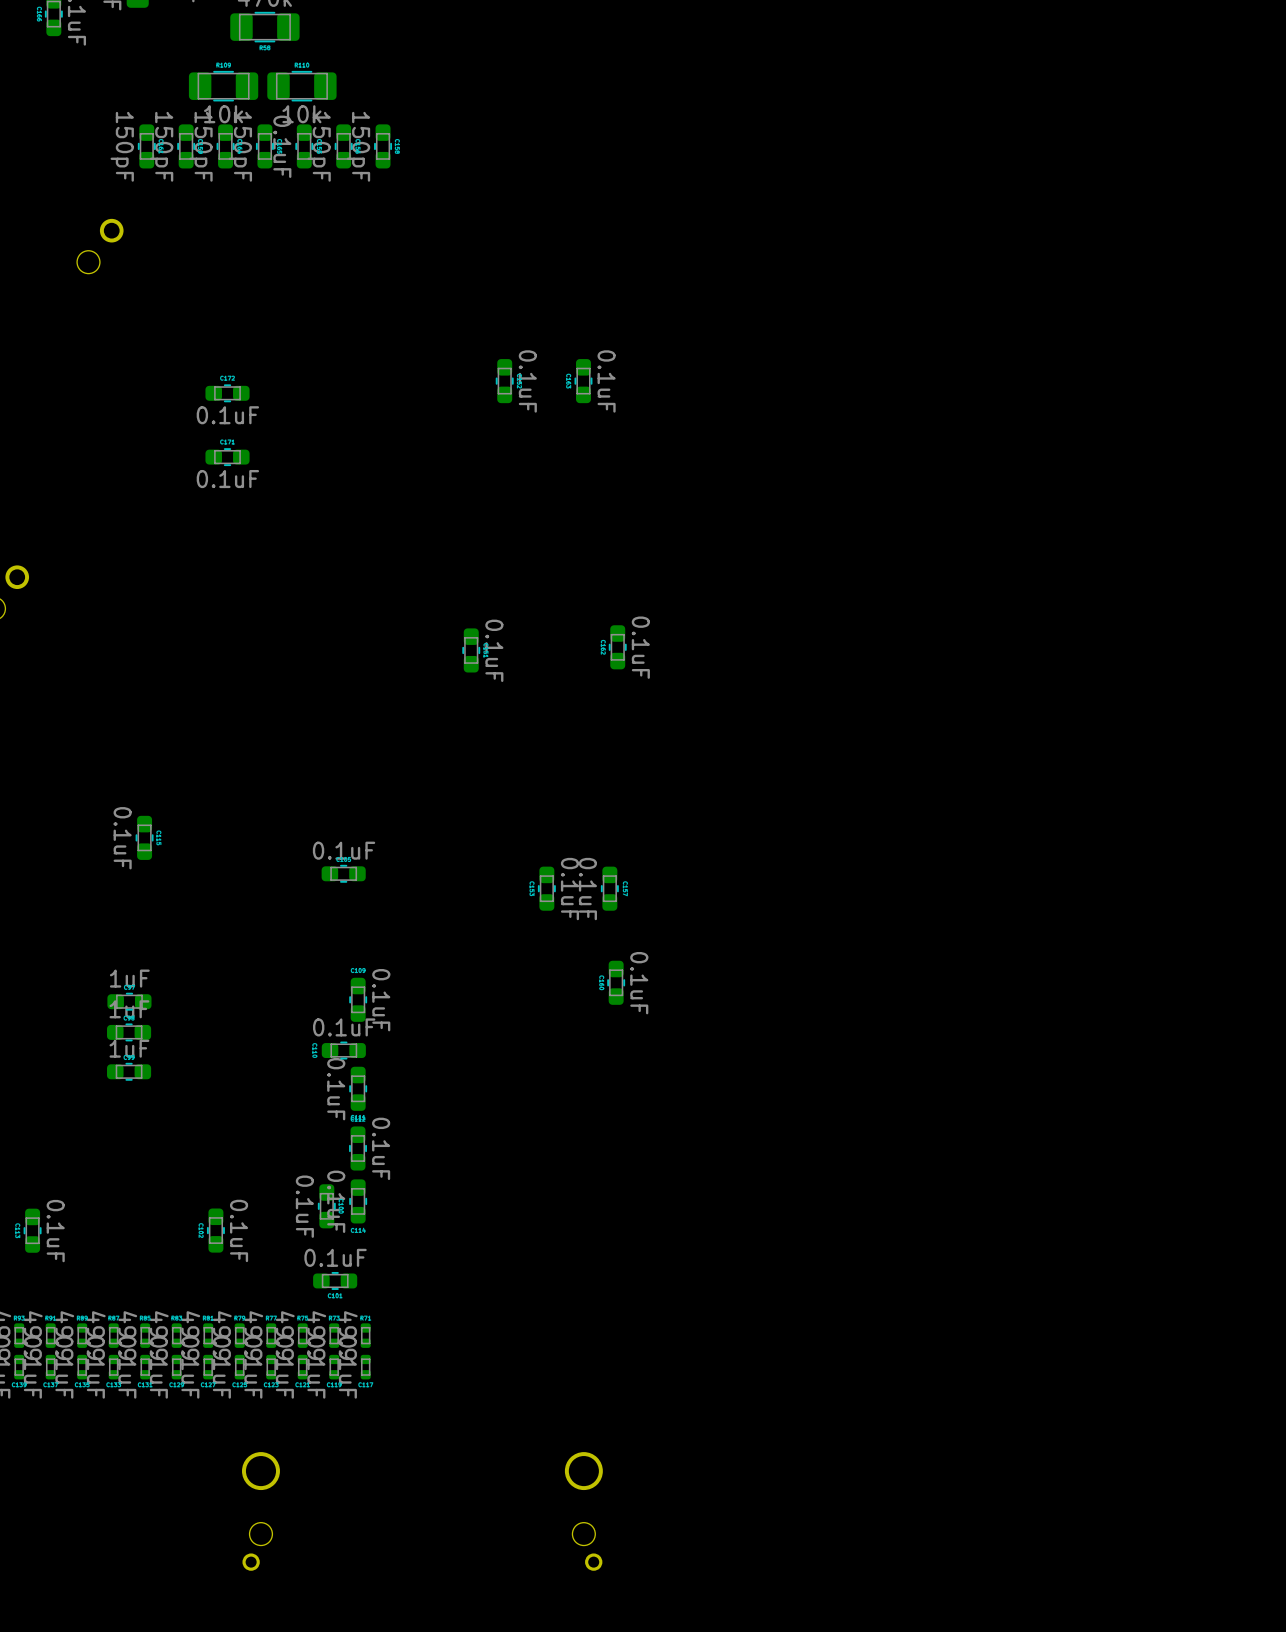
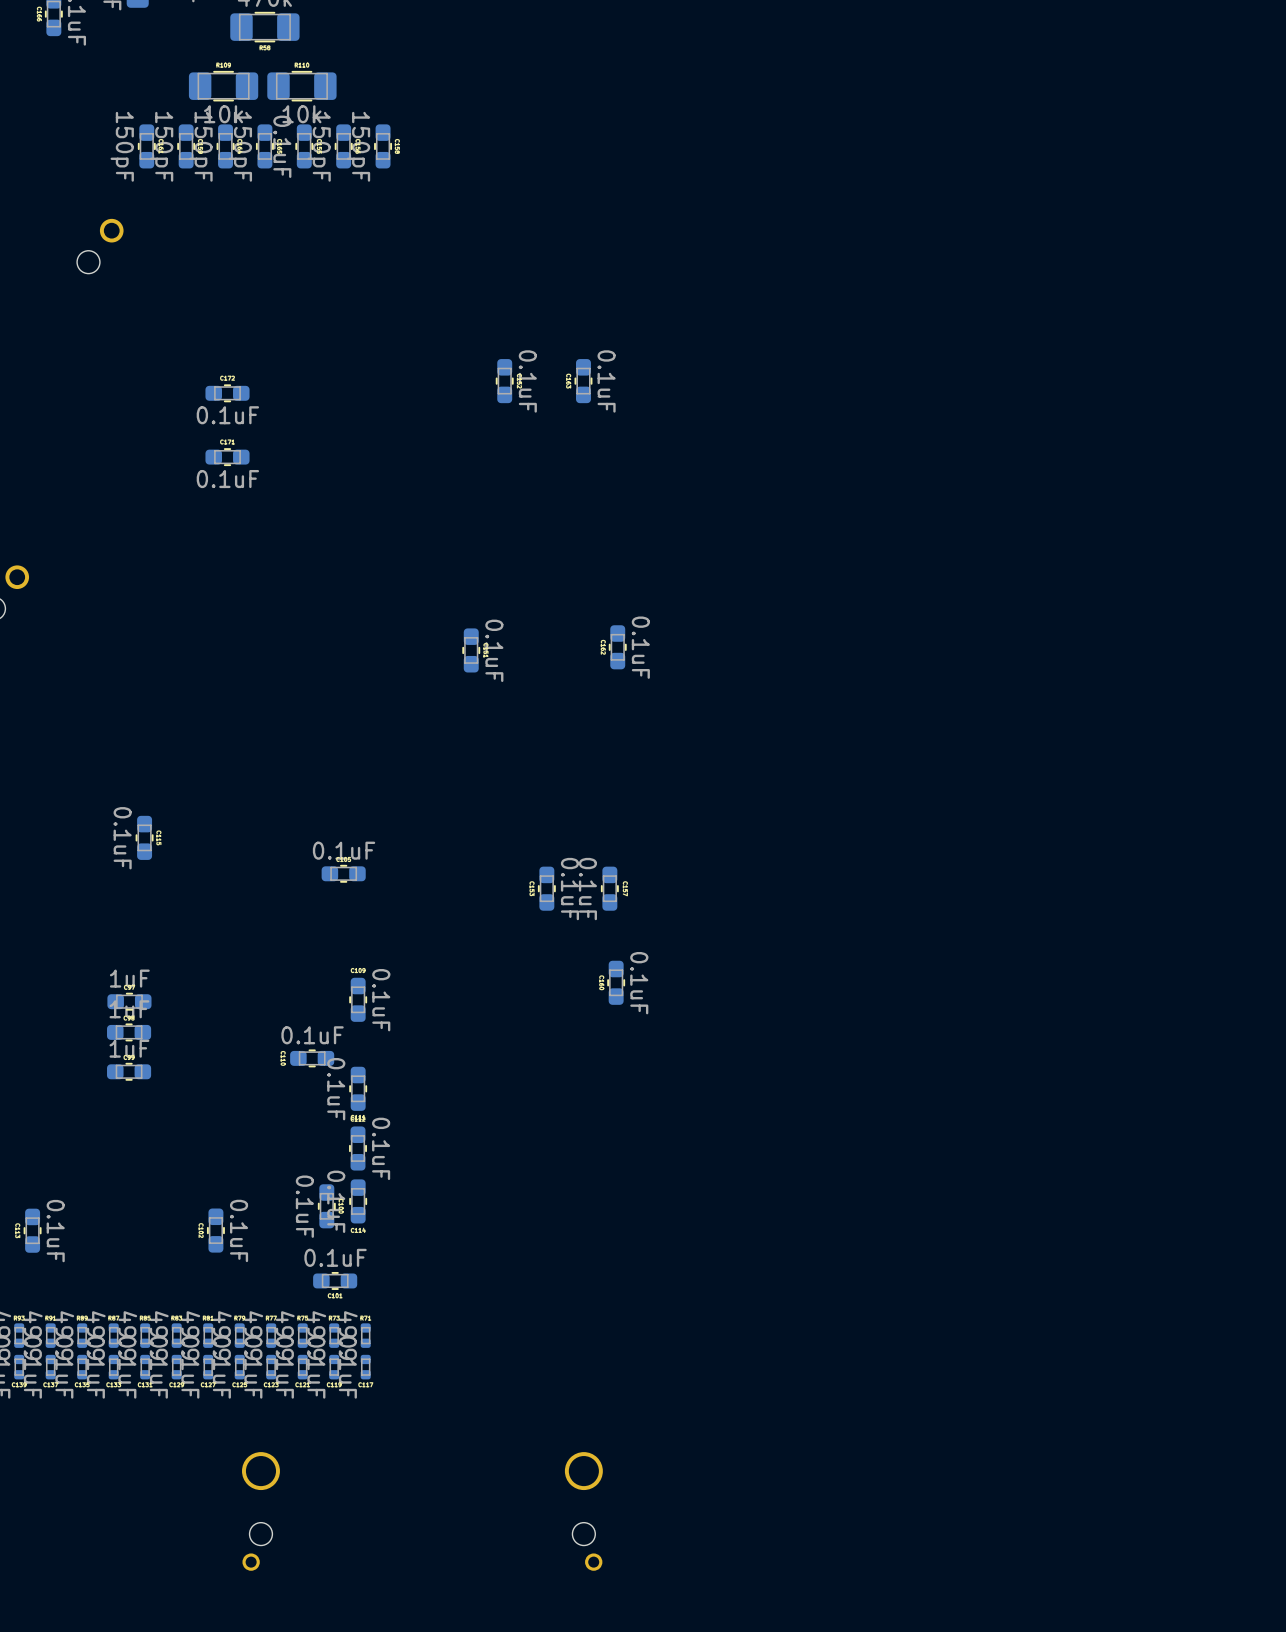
part position: (343, 1050) -> (312, 1058)

